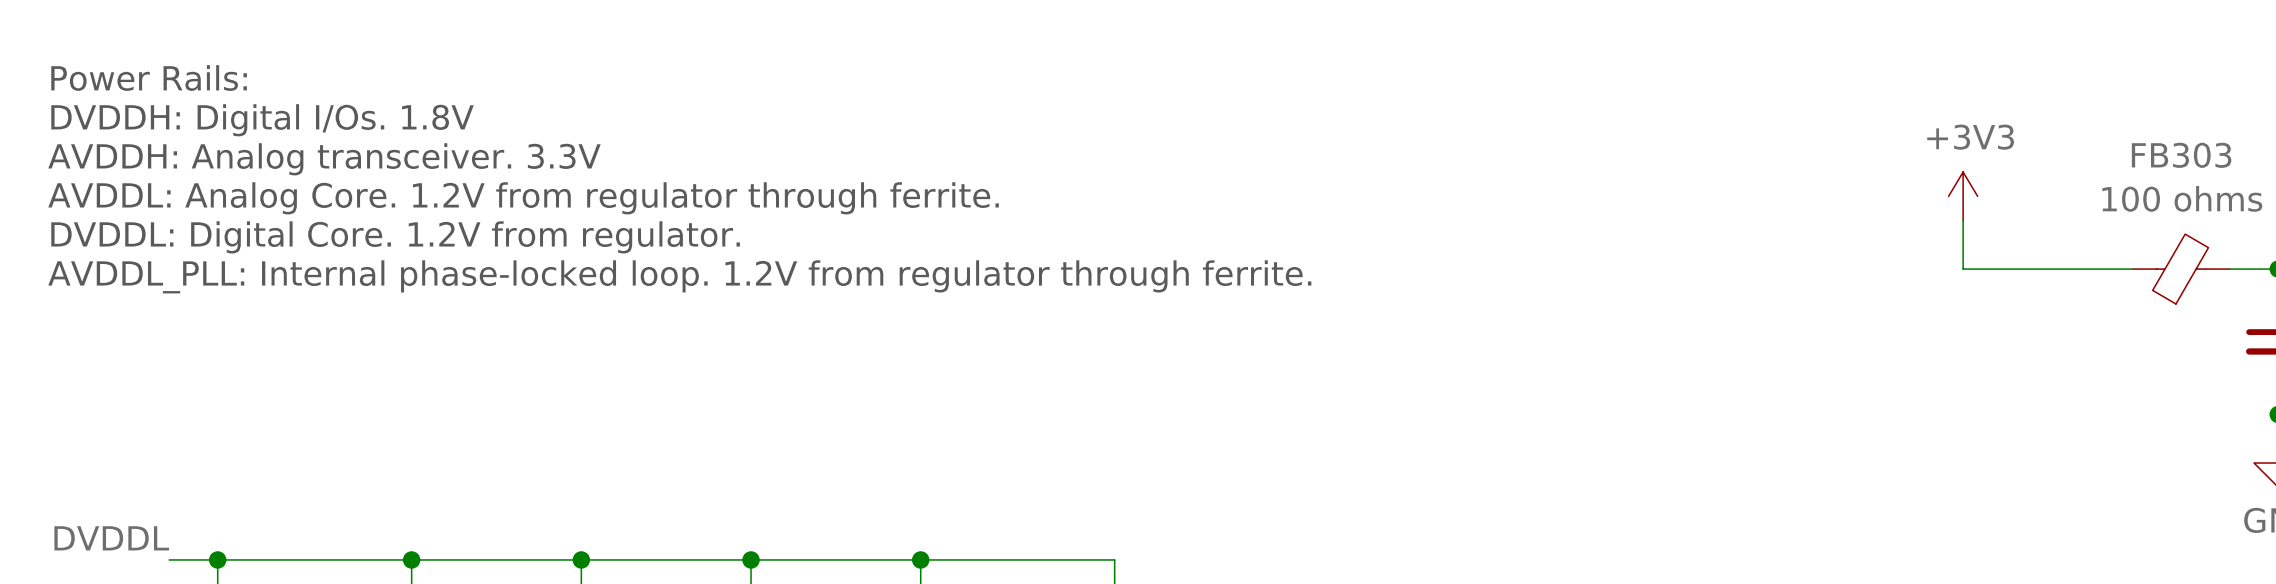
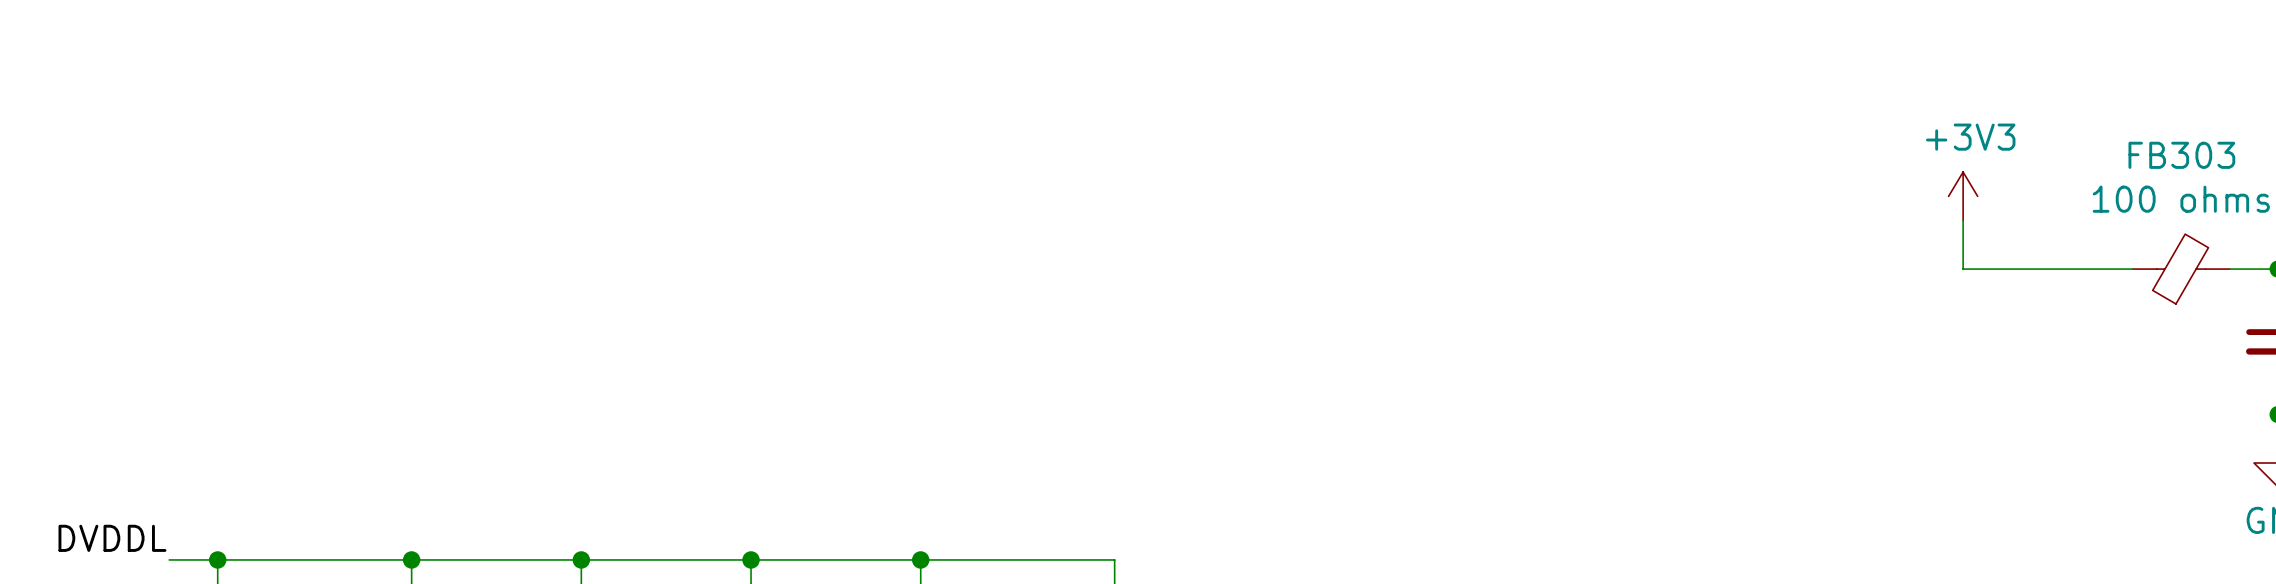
text: Power Rails: (149, 78) -> none
text: DVDDH: Digital I/Os. 1.8V (262, 120) -> none
text: AVDDH: Analog transceiver. 3.3V (324, 159) -> none
text: AVDDL: Analog Core. 1.2V from regulator through ferrite. (523, 198) -> none
text: DVDDL: Digital Core. 1.2V from regulator. (395, 237) -> none
text: AVDDL_PLL: Internal phase-locked loop. 1.2V from regulator through ferrite. (679, 276) -> none

